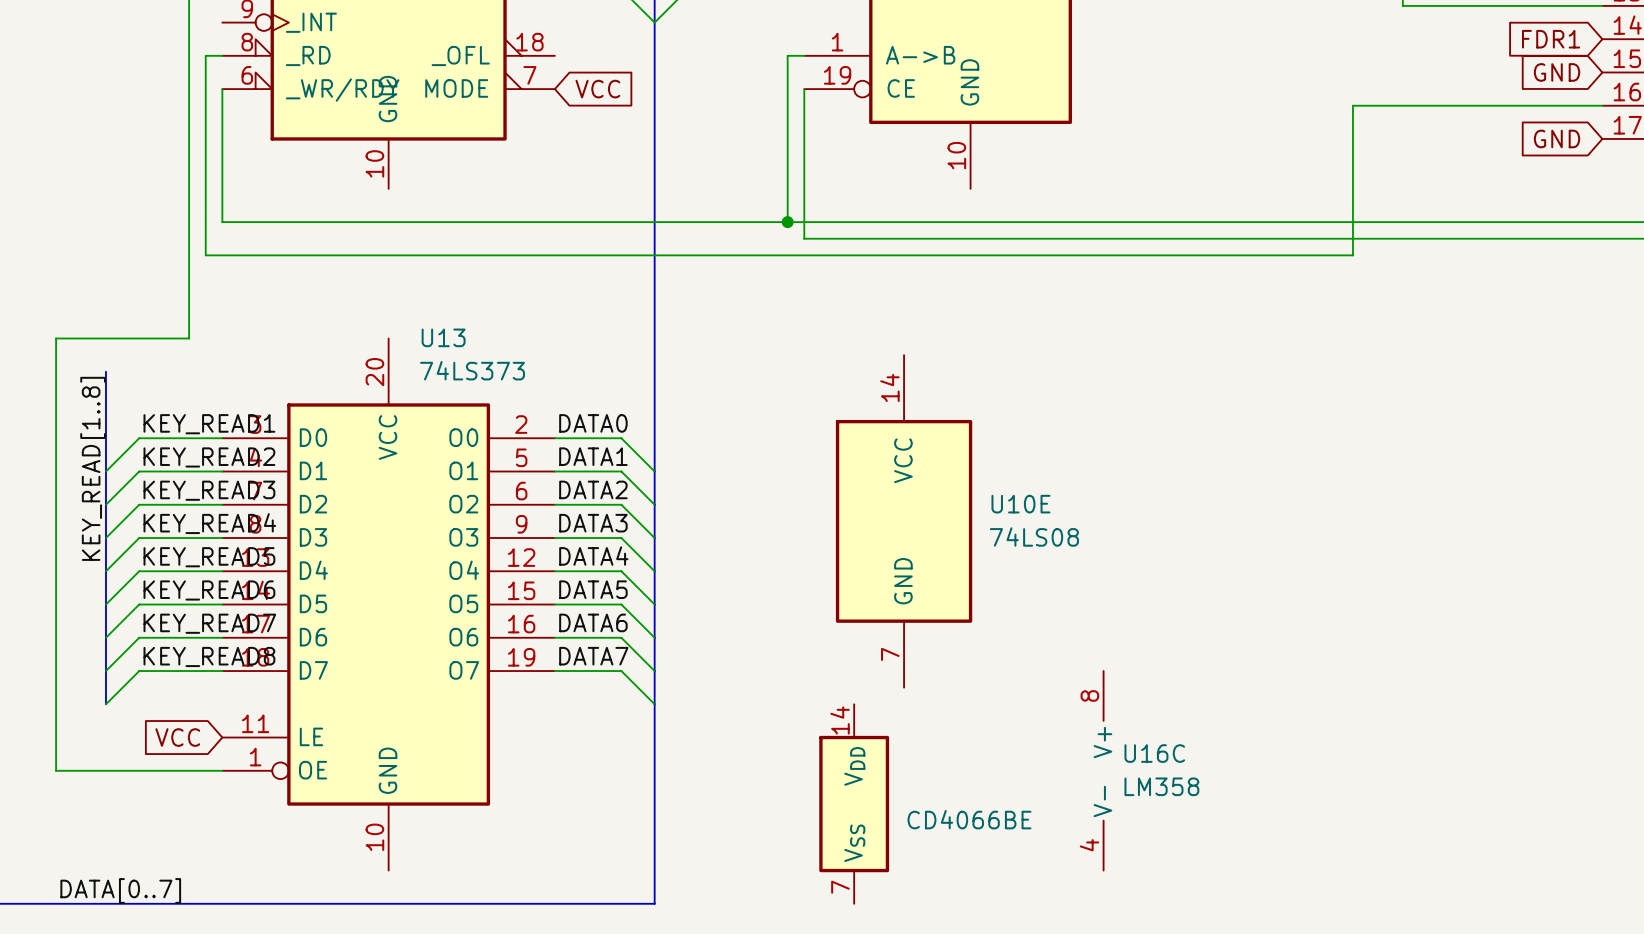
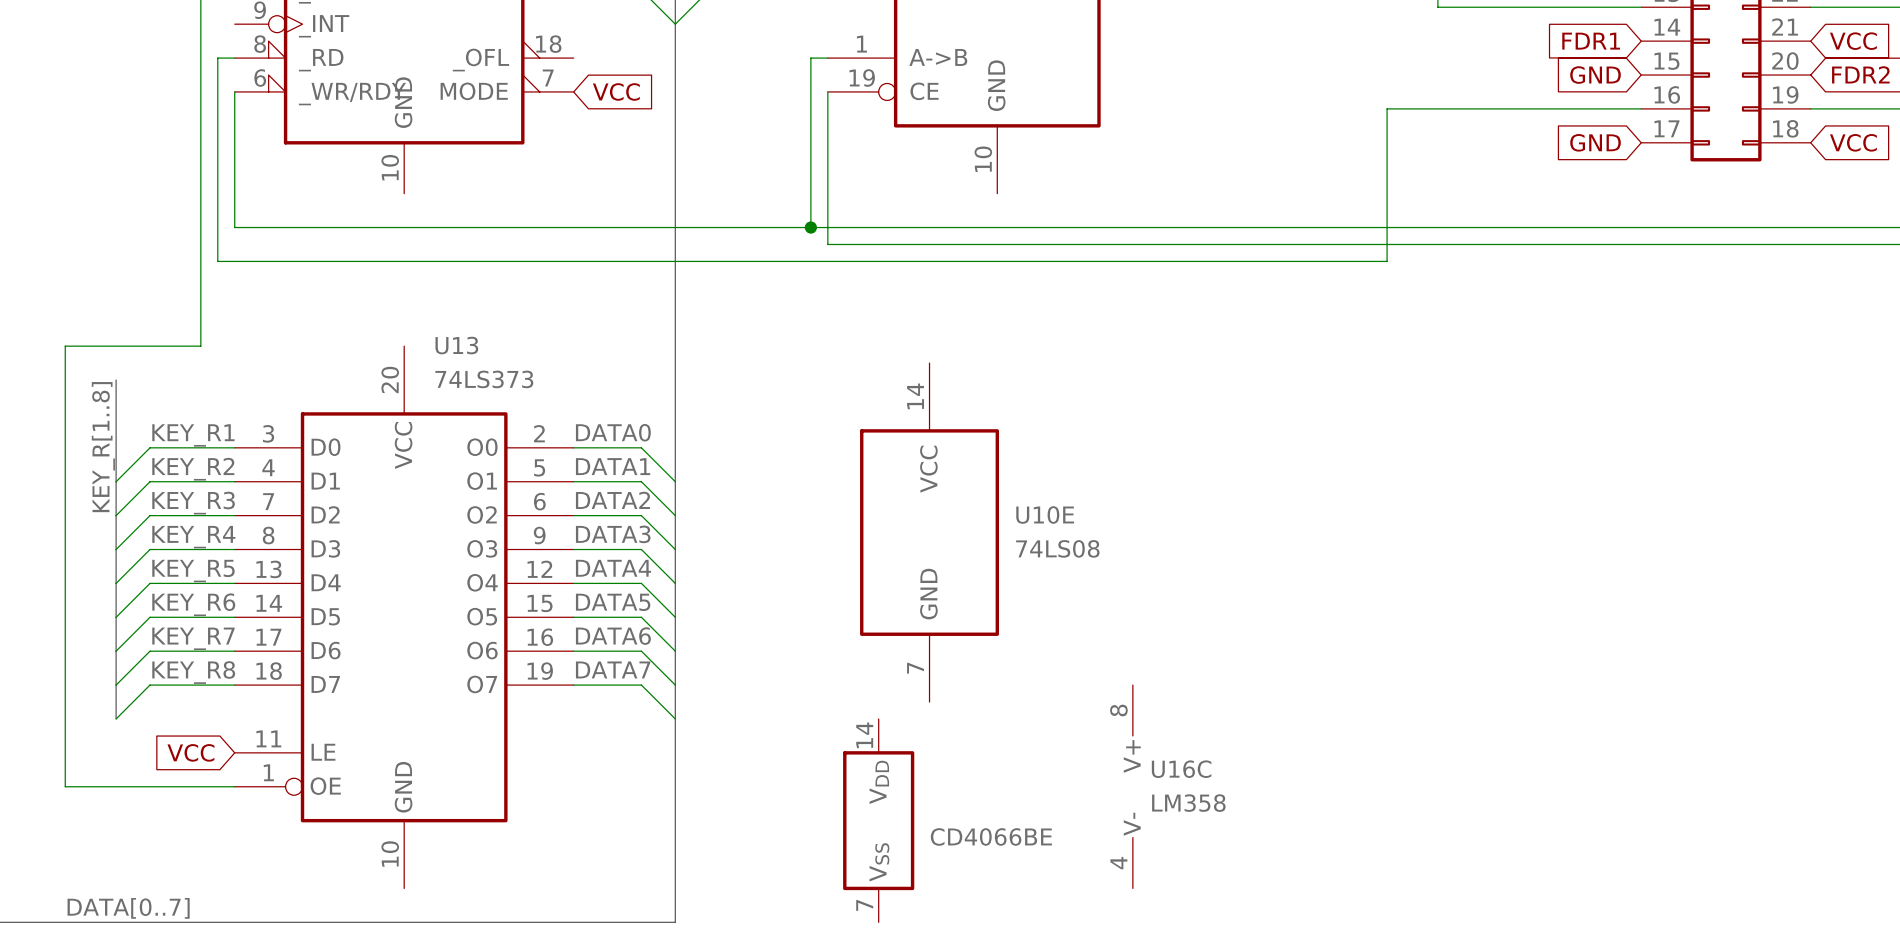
label: KEY_READ1 (209, 424) -> KEY_R1 (193, 435)
label: KEY_READ2 (209, 457) -> KEY_R2 (193, 469)
label: KEY_READ[1..8] (93, 468) -> KEY_R[1..8] (103, 447)
label: KEY_READ3 (209, 490) -> KEY_R3 (193, 503)
label: KEY_READ4 (209, 523) -> KEY_R4 (193, 537)
label: KEY_READ5 (209, 557) -> KEY_R5 (193, 571)
label: KEY_READ6 (209, 590) -> KEY_R6 (193, 604)
label: KEY_READ7 (209, 623) -> KEY_R7 (193, 638)
label: KEY_READ8 (209, 656) -> KEY_R8 (193, 672)

